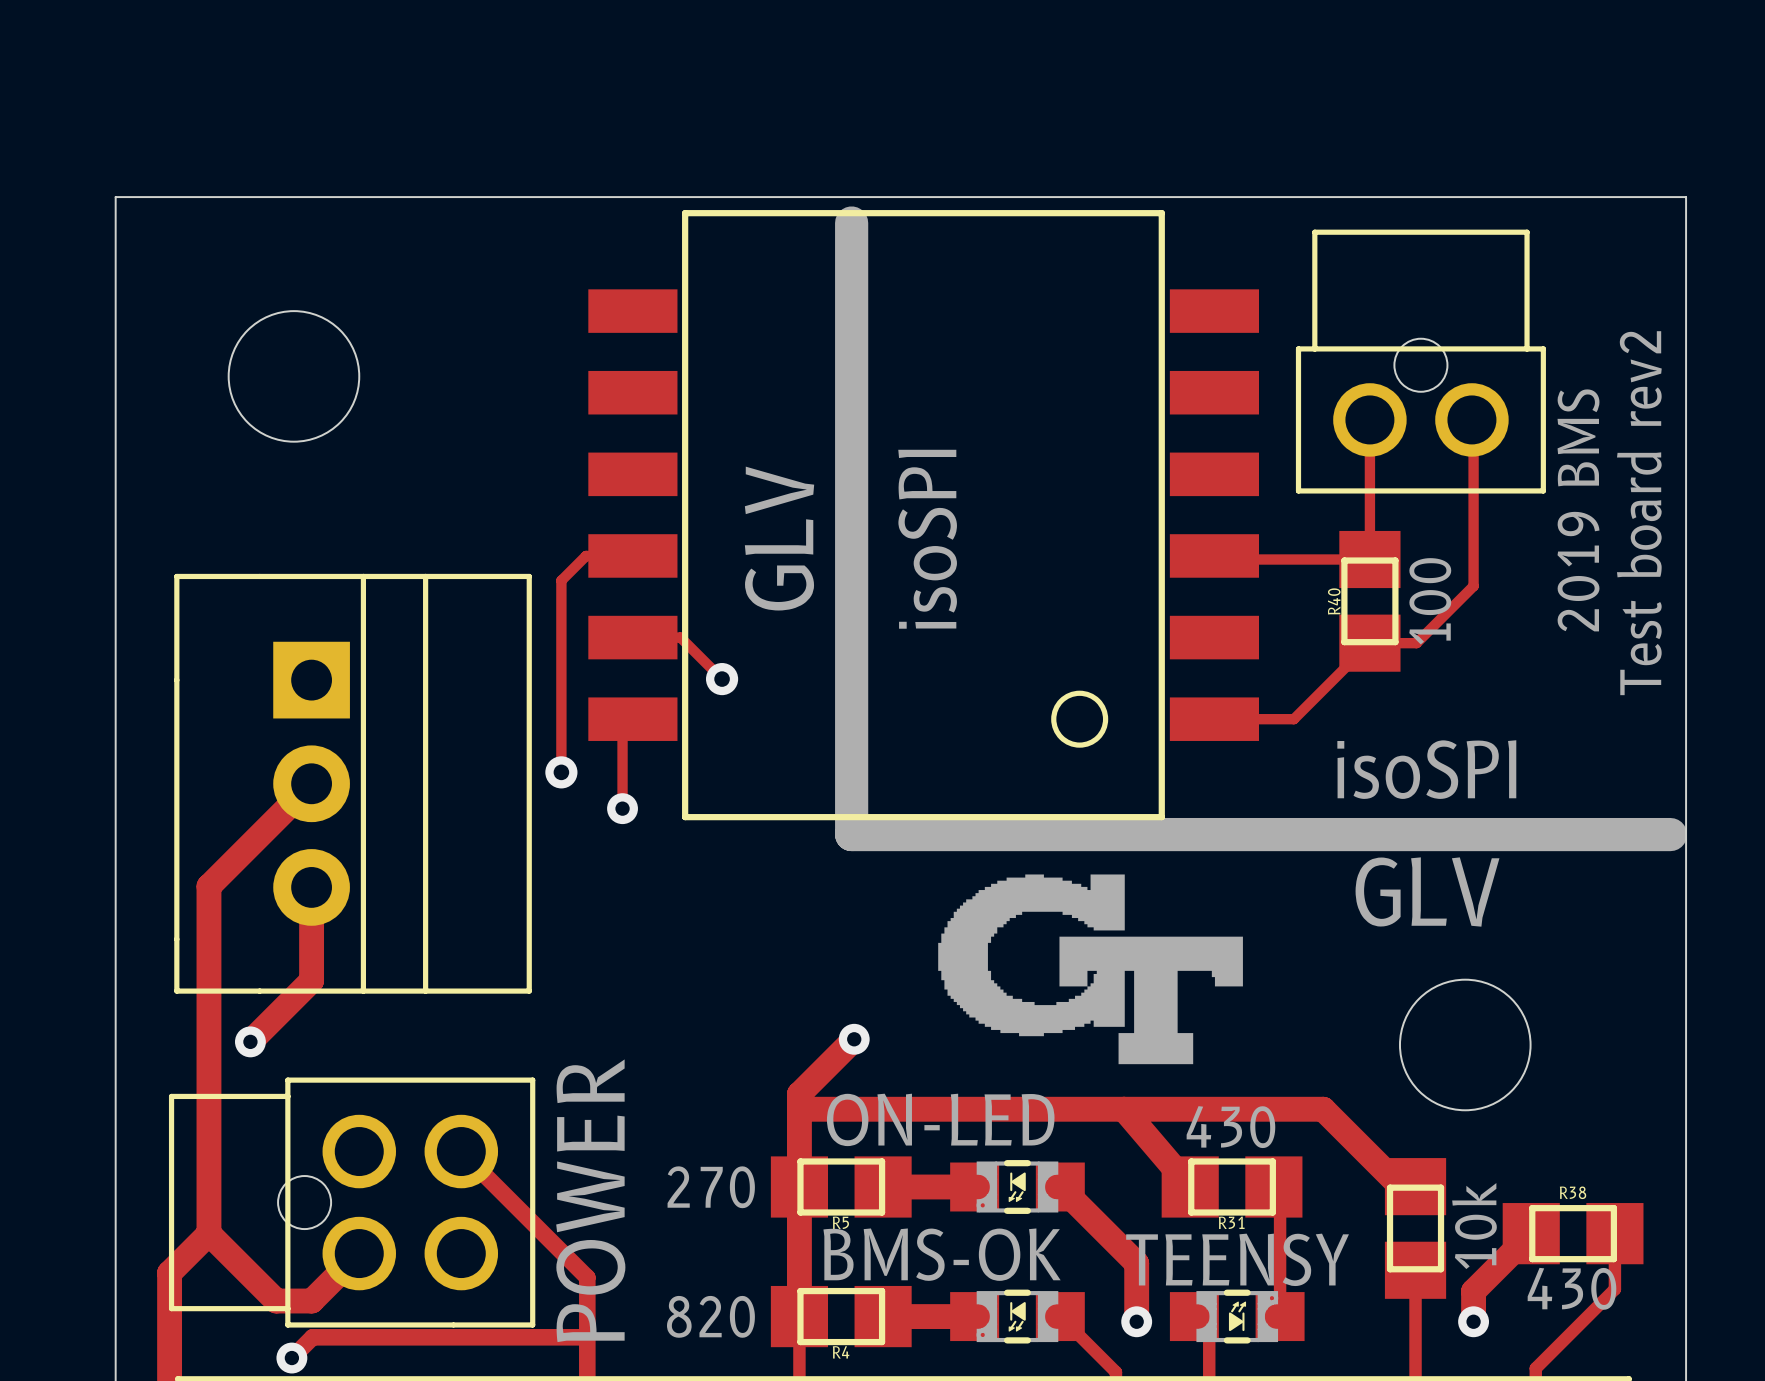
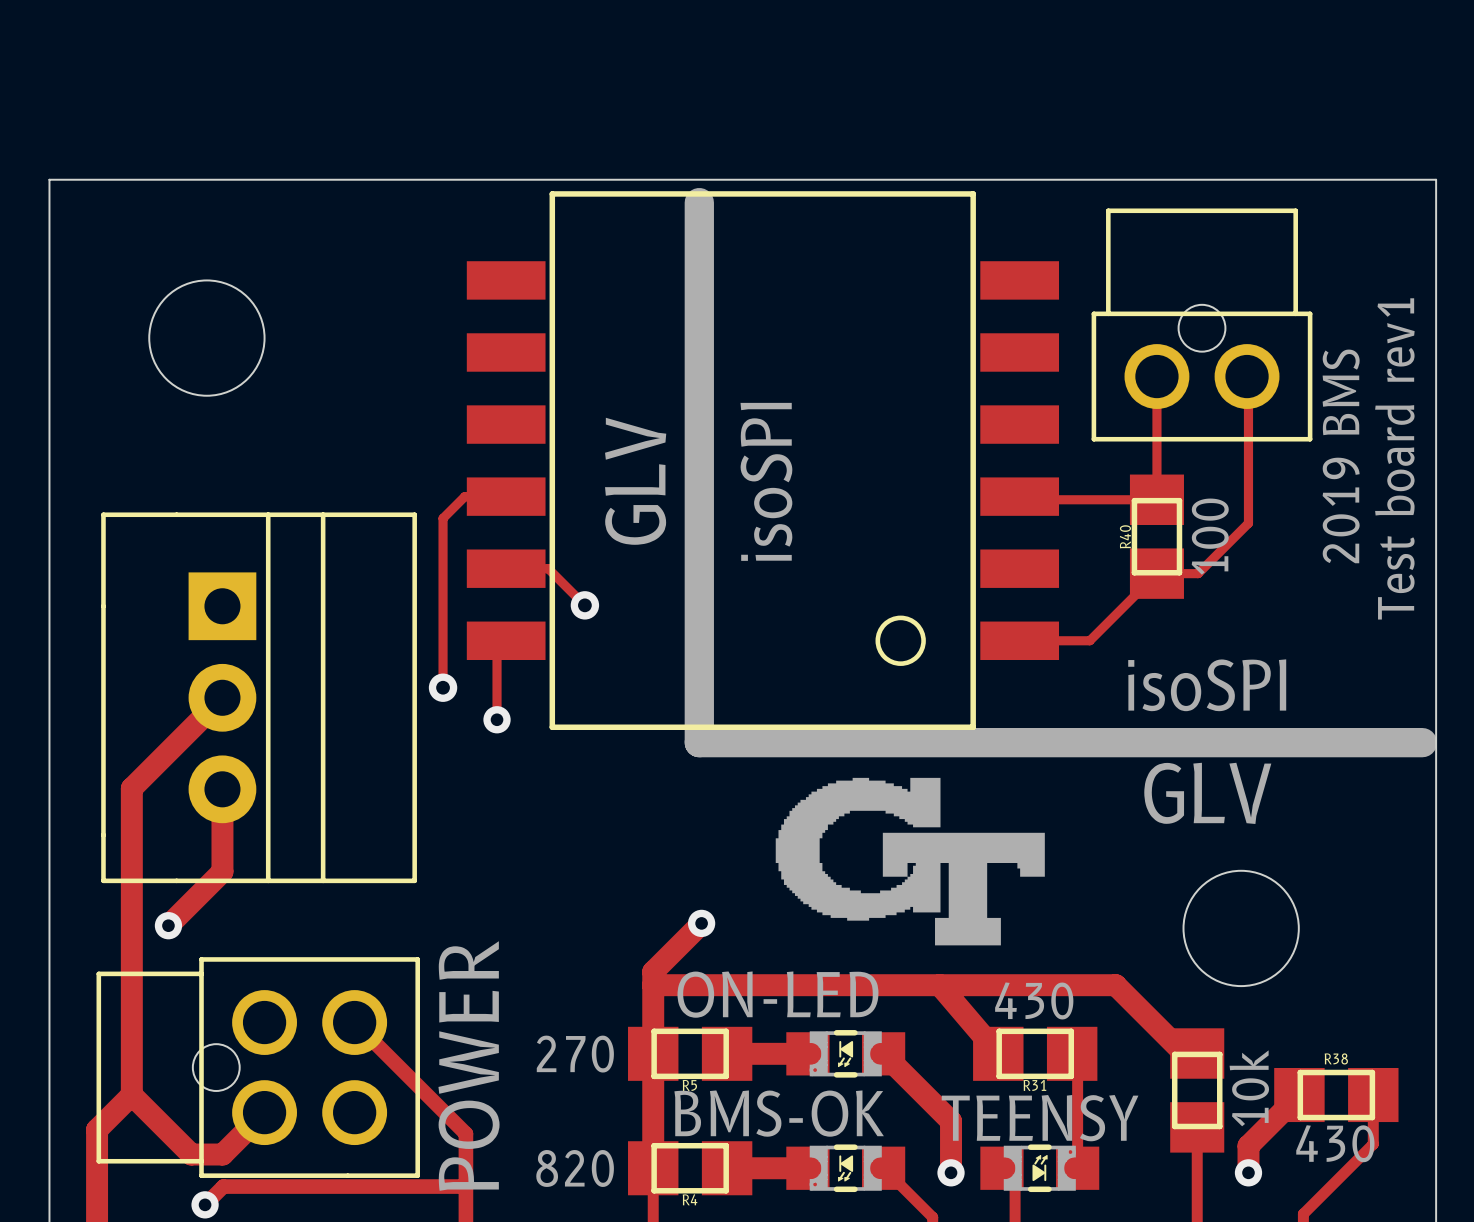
text: Test board rev2 (1639, 513) -> Test board rev1 (1394, 458)

